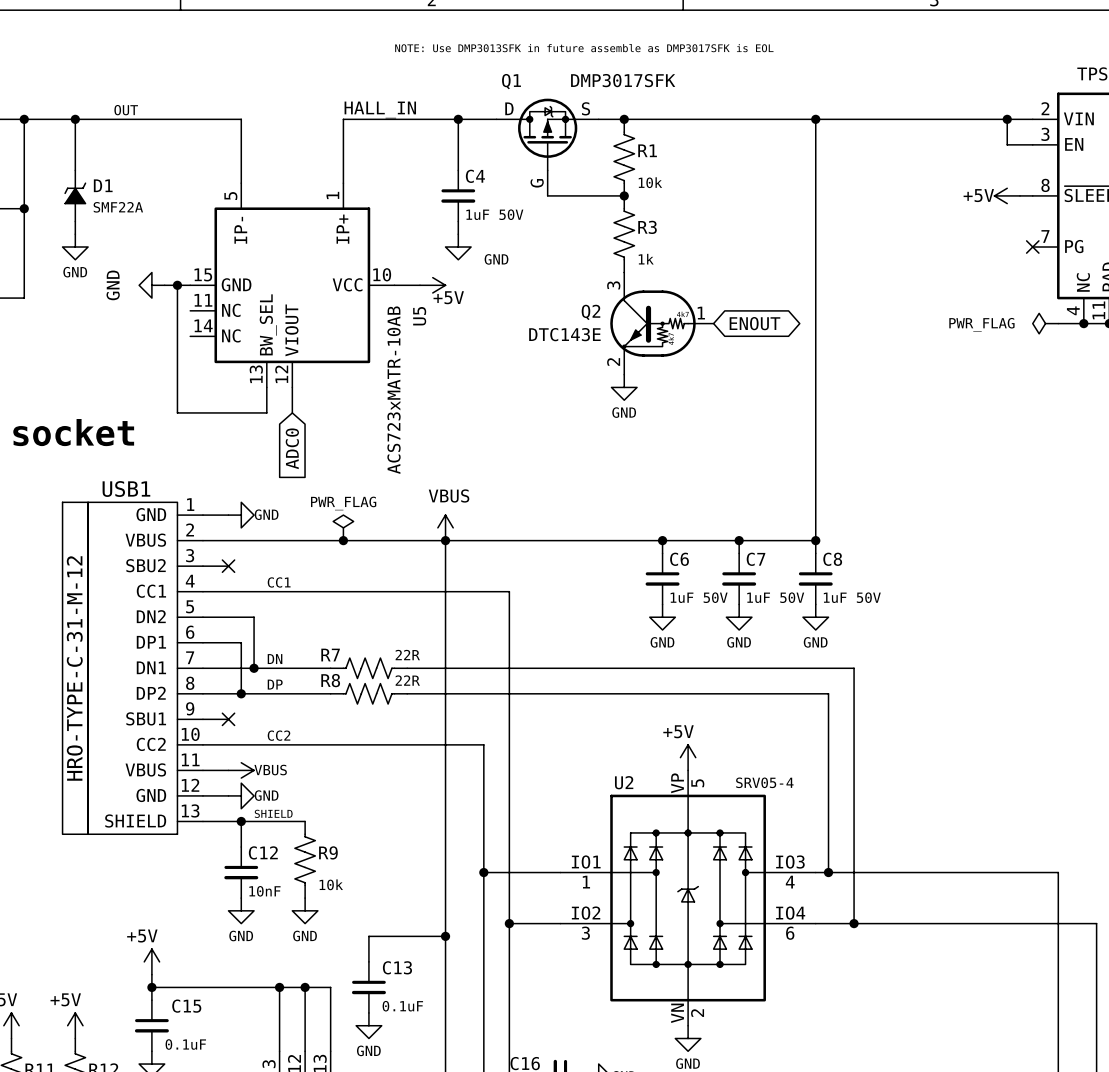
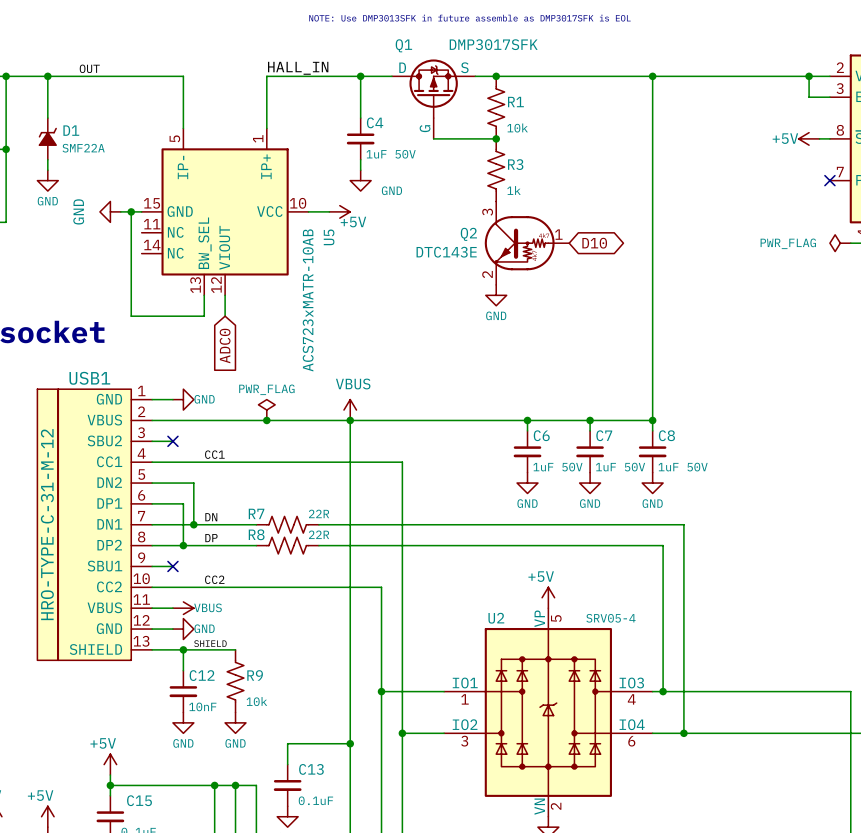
global label: ENOUT (754, 323) -> D10 (594, 243)

